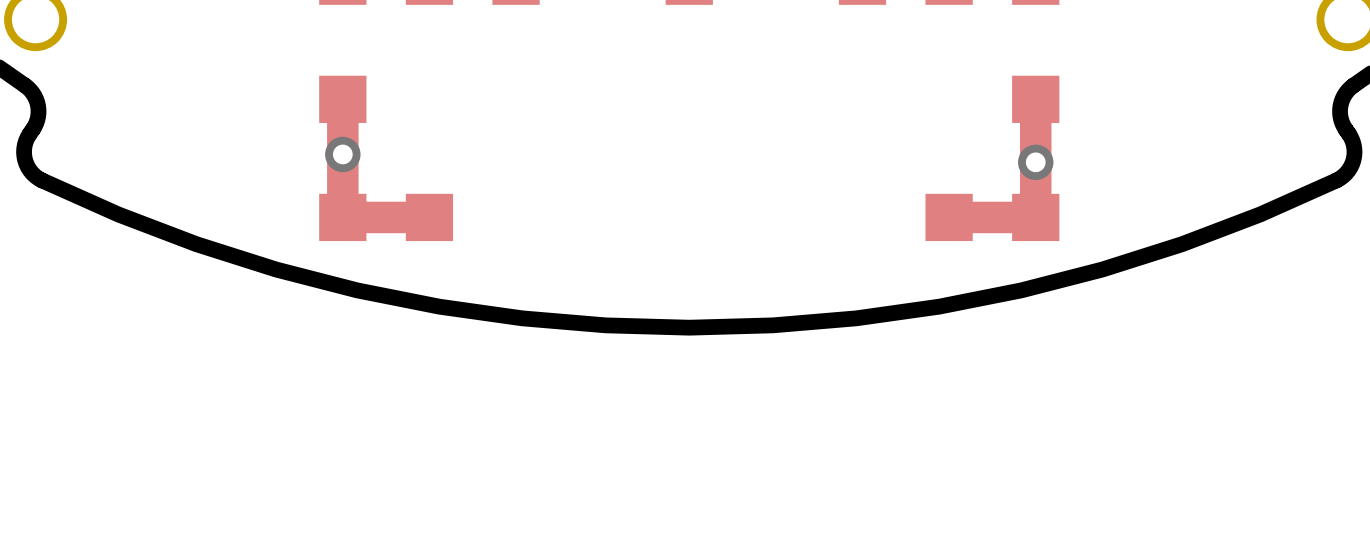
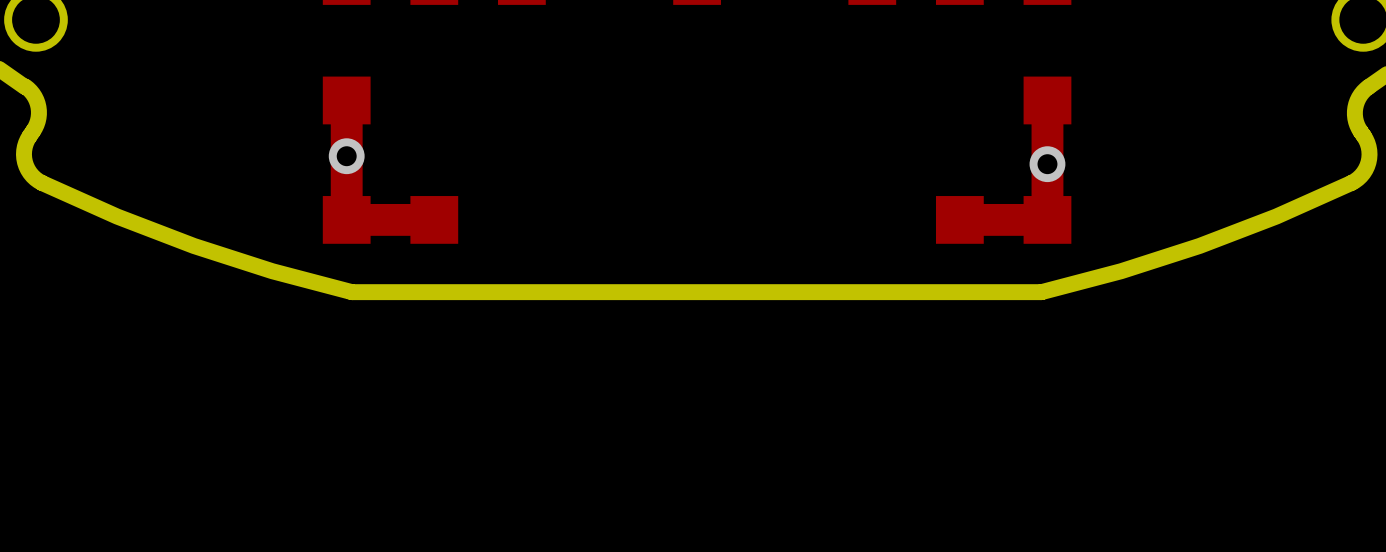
board edge: (1353, 85) (1344, 95) (1340, 109) (1342, 123) (1350, 137) (1354, 148) (1353, 159) (1348, 170) (1336, 180) (1260, 214) (1182, 244) (1102, 269) (1021, 290) (939, 306) (856, 318) (772, 325) (689, 327) (605, 325) (522, 318) (439, 306) (357, 290) (276, 269) (196, 244) (118, 214) (41, 180) (32, 173) (25, 159) (24, 148) (29, 133) -> (1368, 87) (1357, 100) (1354, 114) (1357, 125) (1367, 142) (1369, 158) (1363, 172) (1354, 181) (1276, 216) (1199, 245) (1121, 271) (1041, 292) (351, 292) (272, 271) (194, 245) (117, 216) (42, 182) (32, 176) (25, 162) (24, 146) (29, 135)

